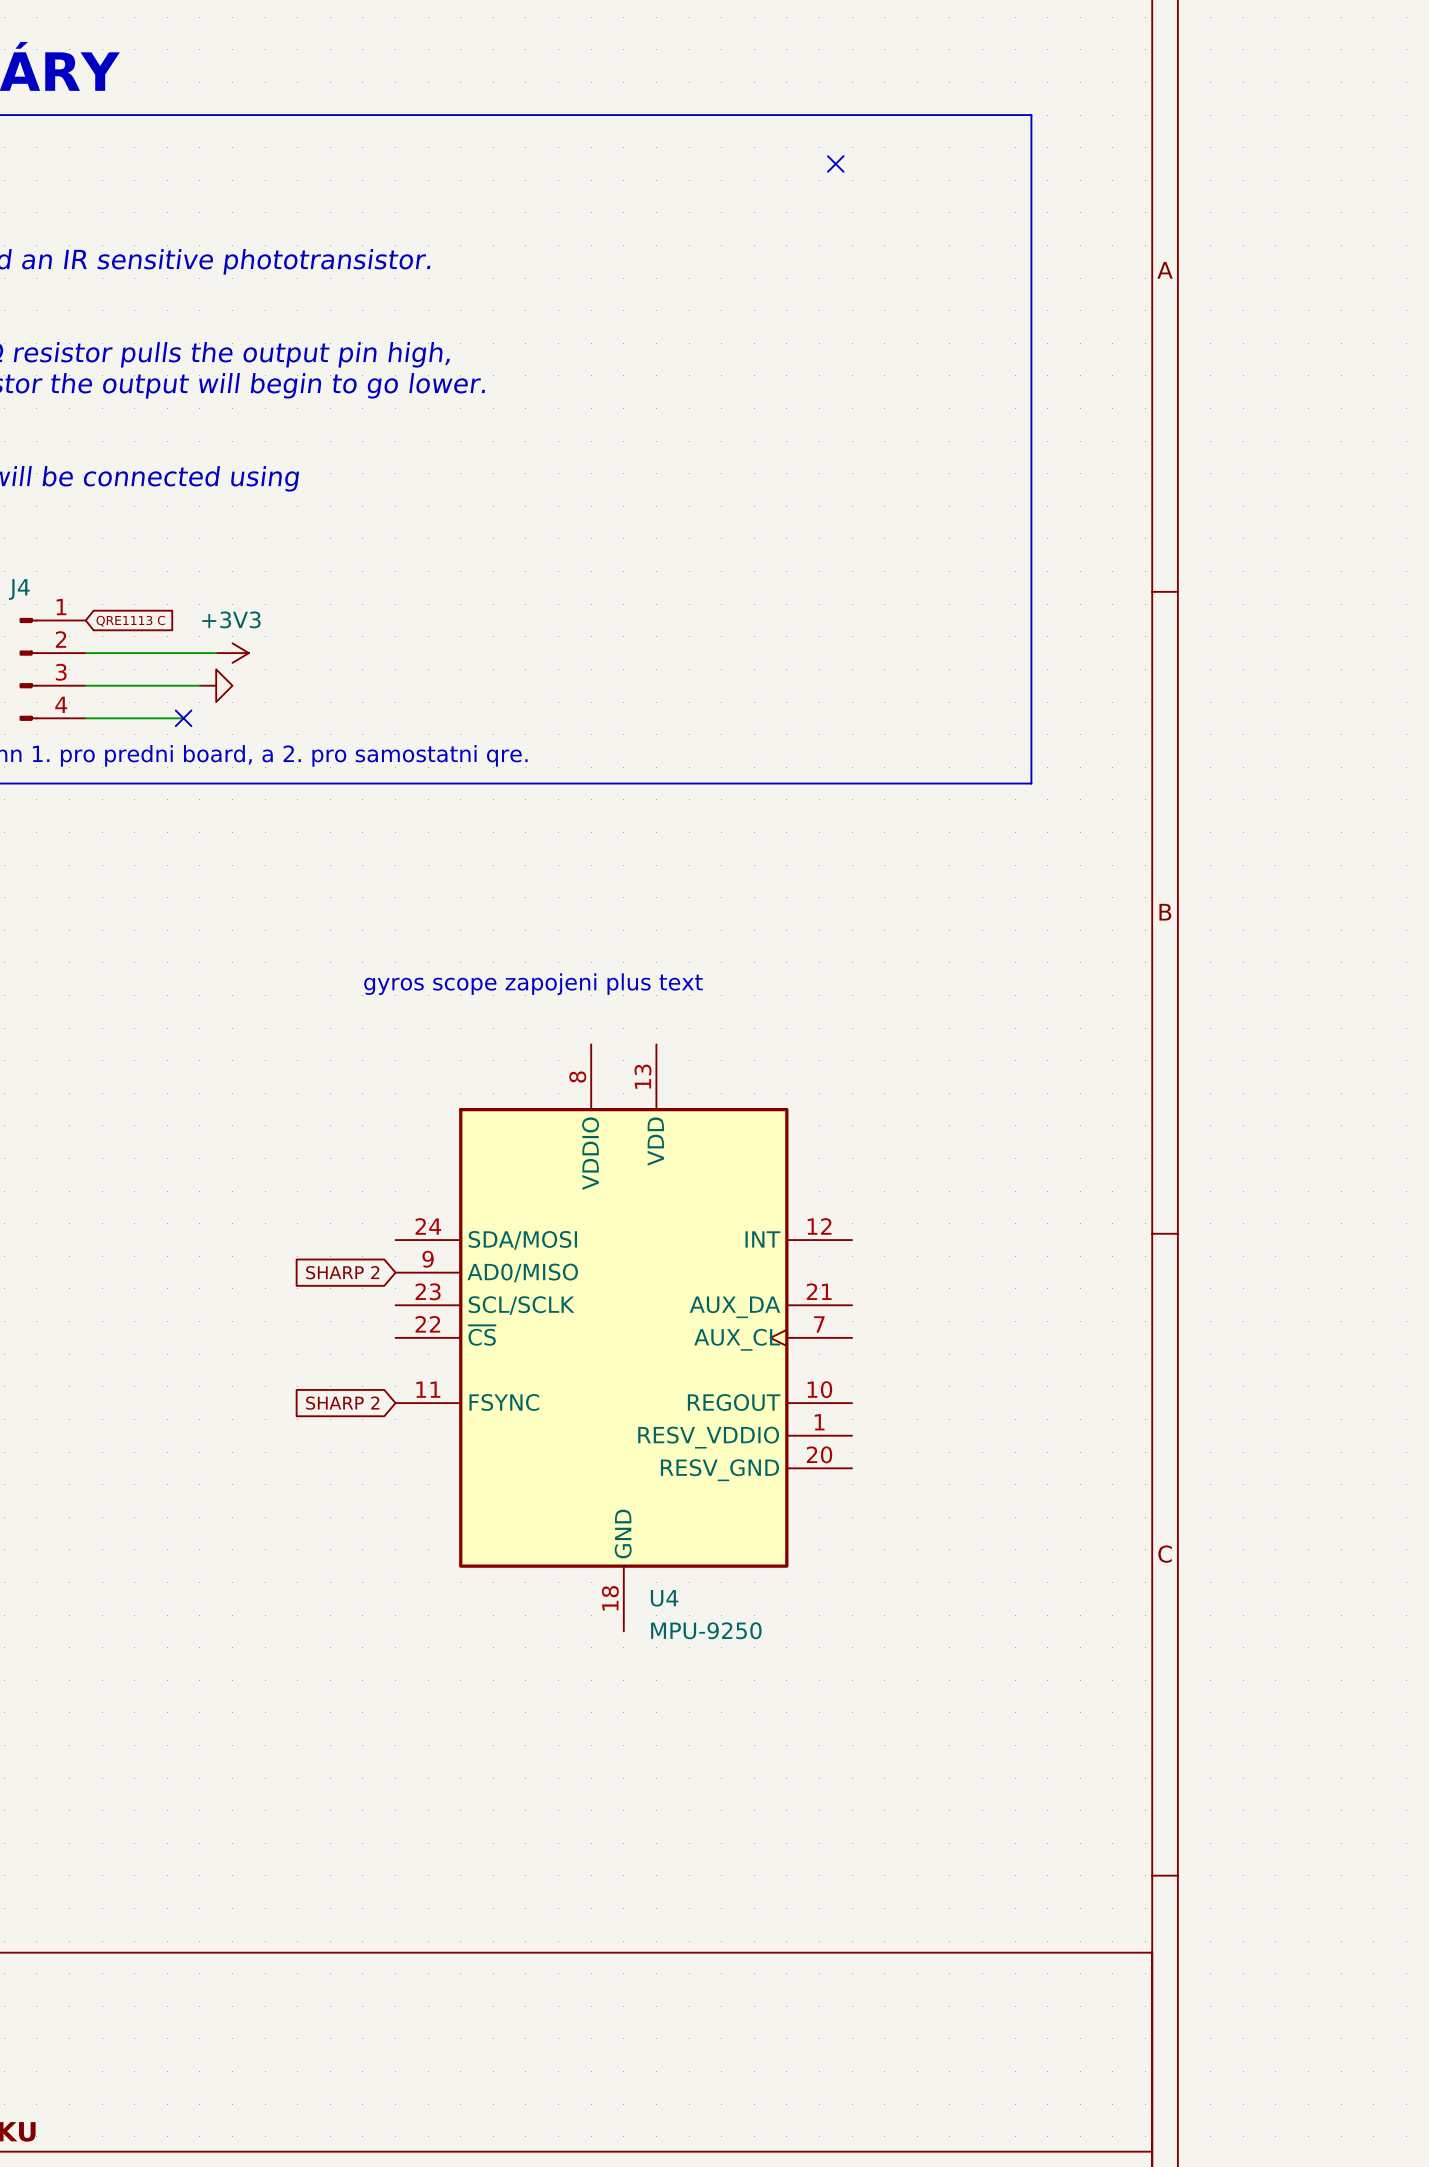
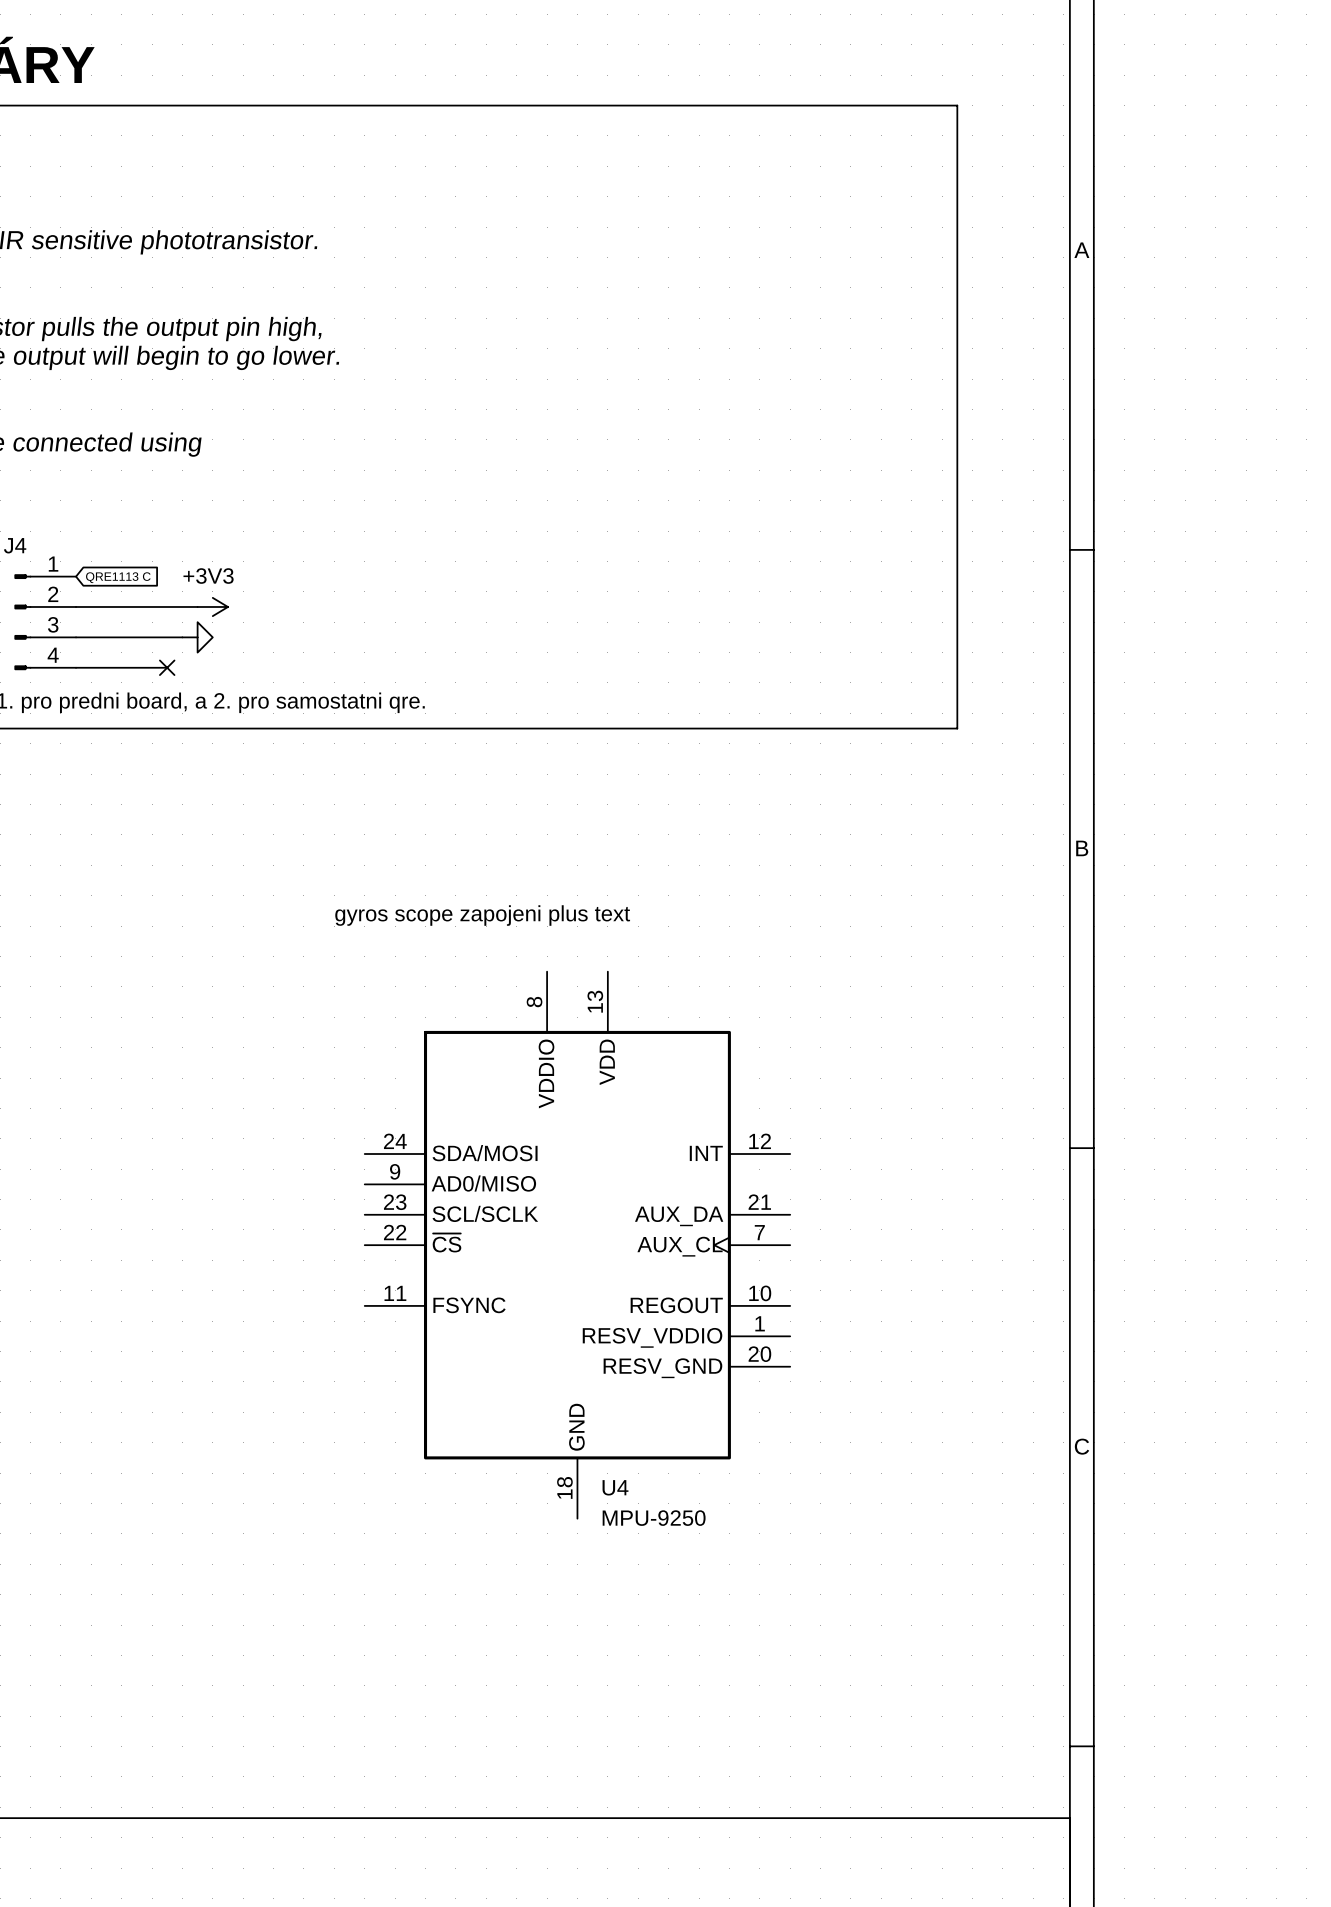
no-connect mark: (835, 163) -> none
global label: SHARP 2 (342, 1272) -> none
global label: SHARP 2 (342, 1403) -> none

